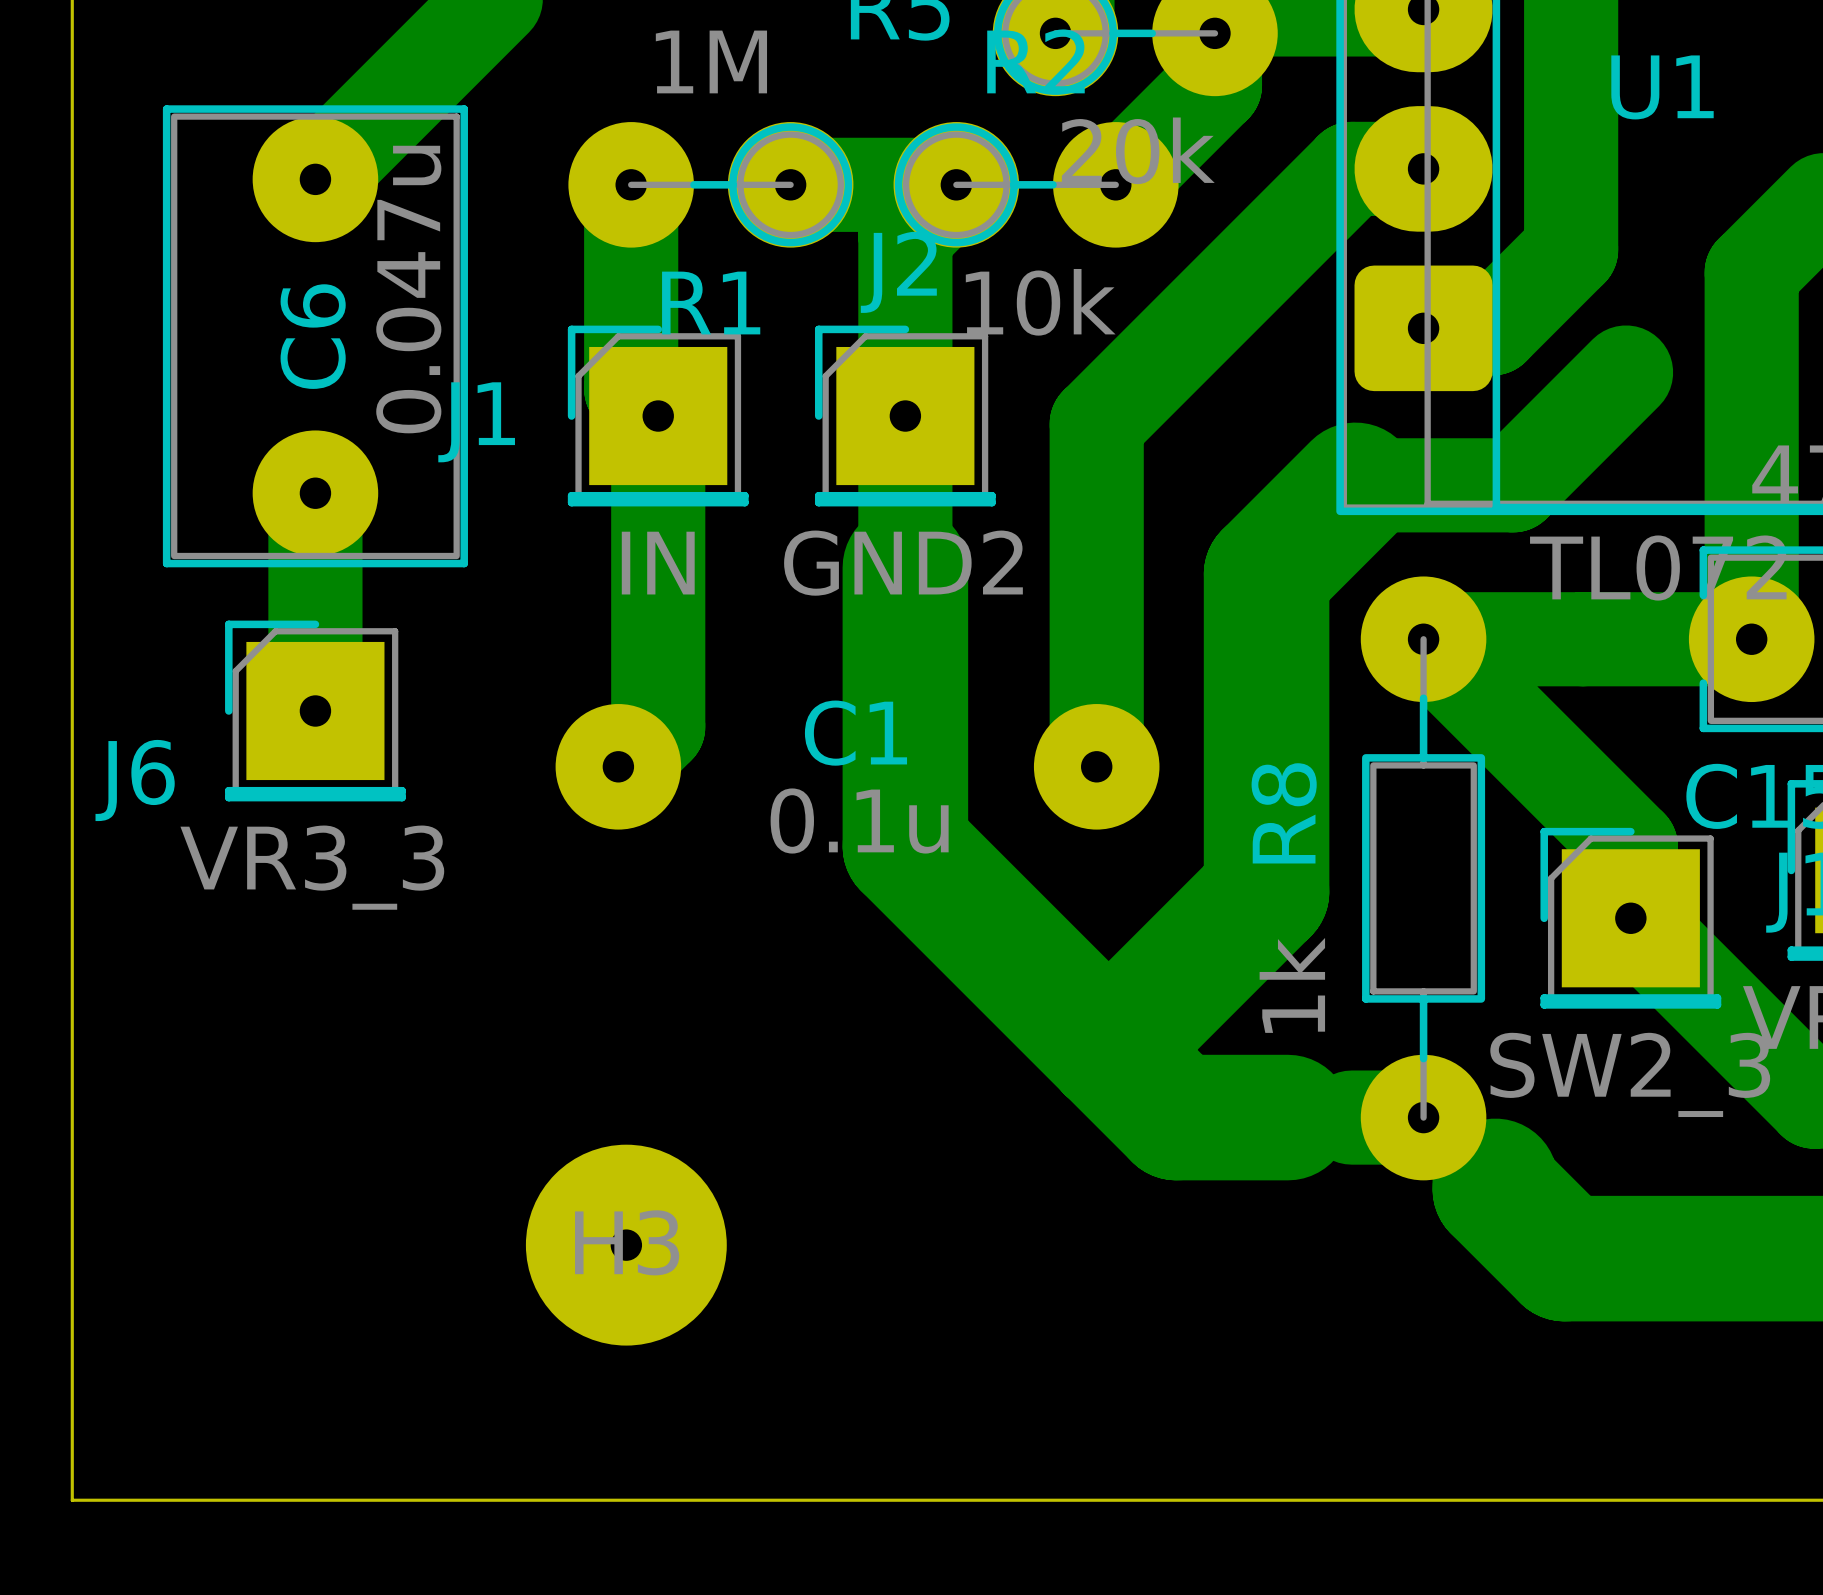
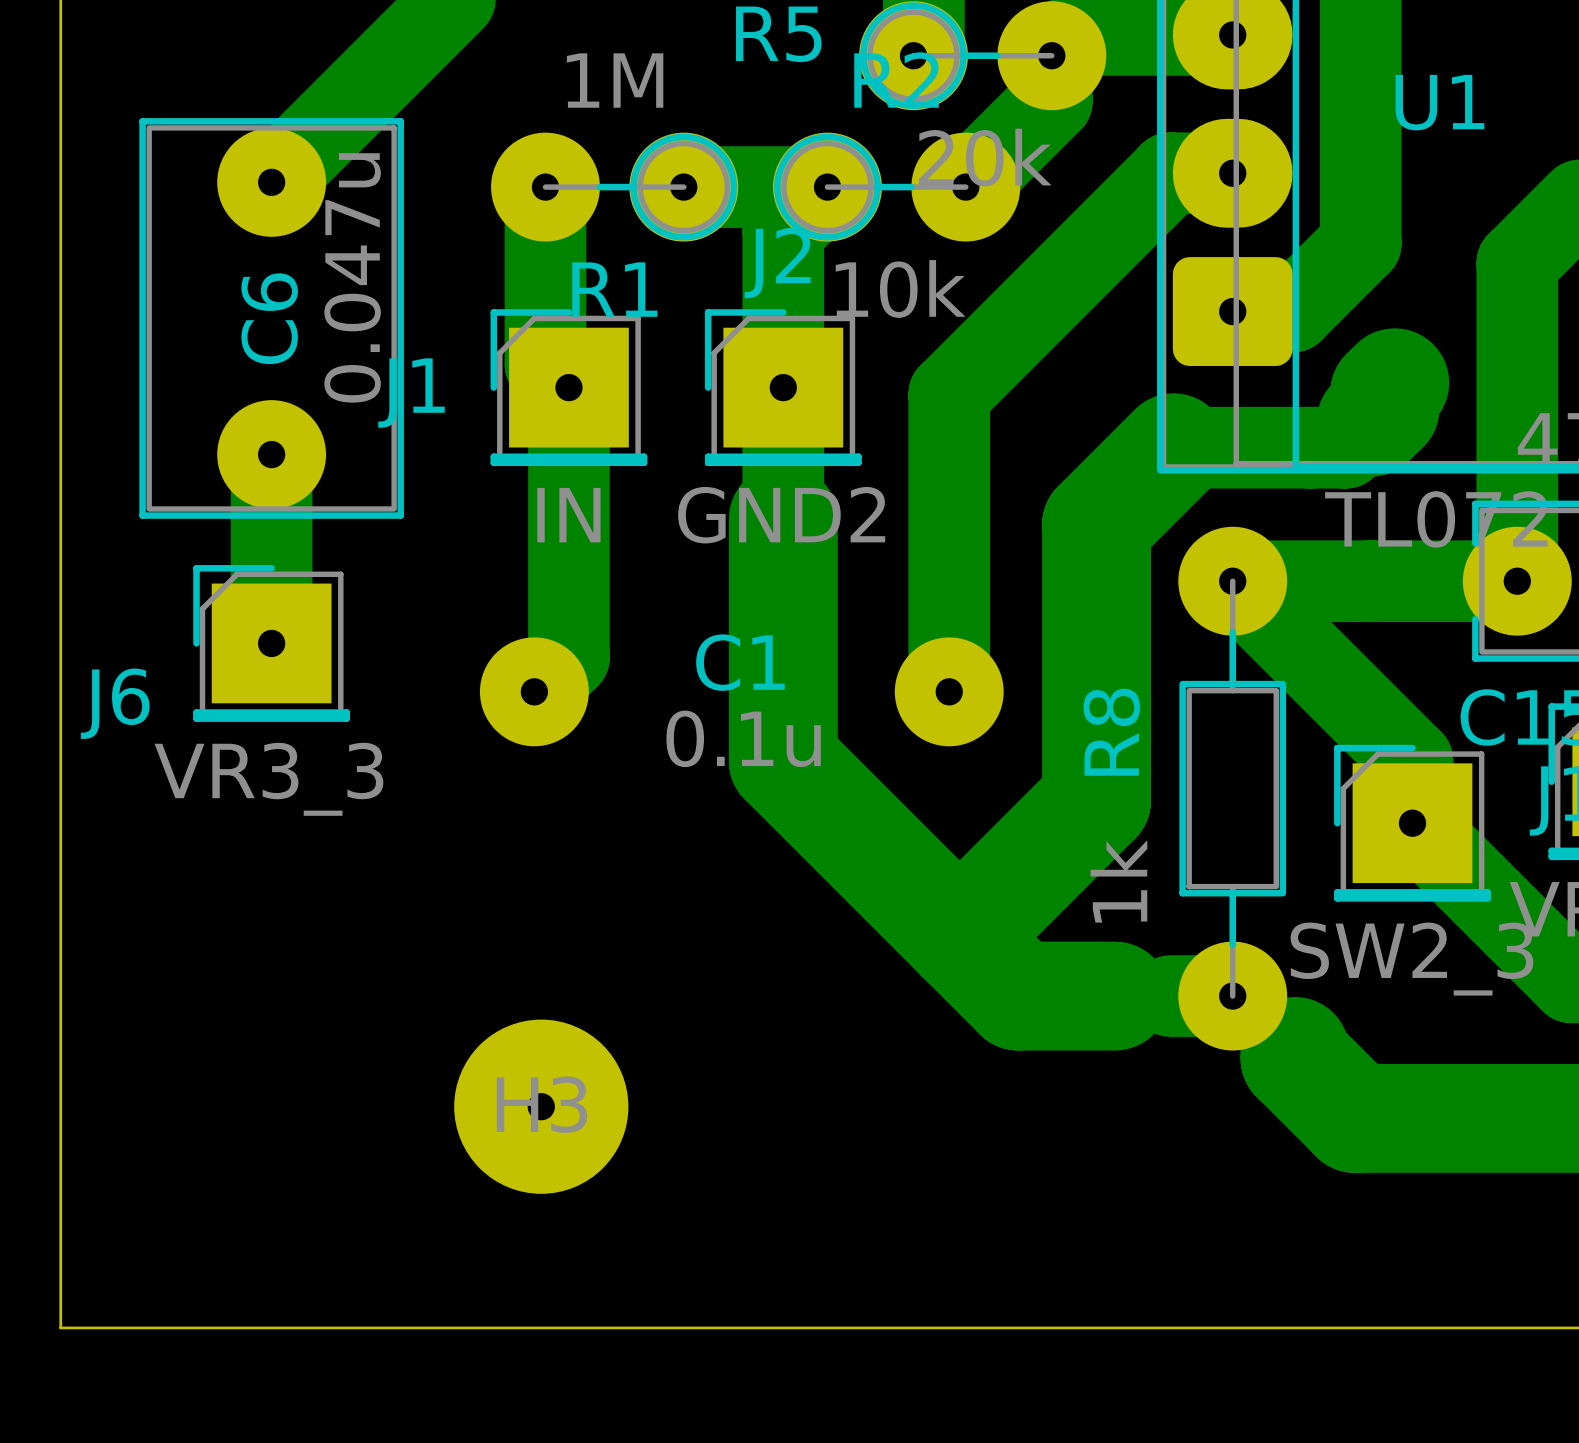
bottom track: (1626, 372) (1513, 485) -> (1394, 382) (1384, 392) (1384, 408) (1345, 447) (1310, 447)

